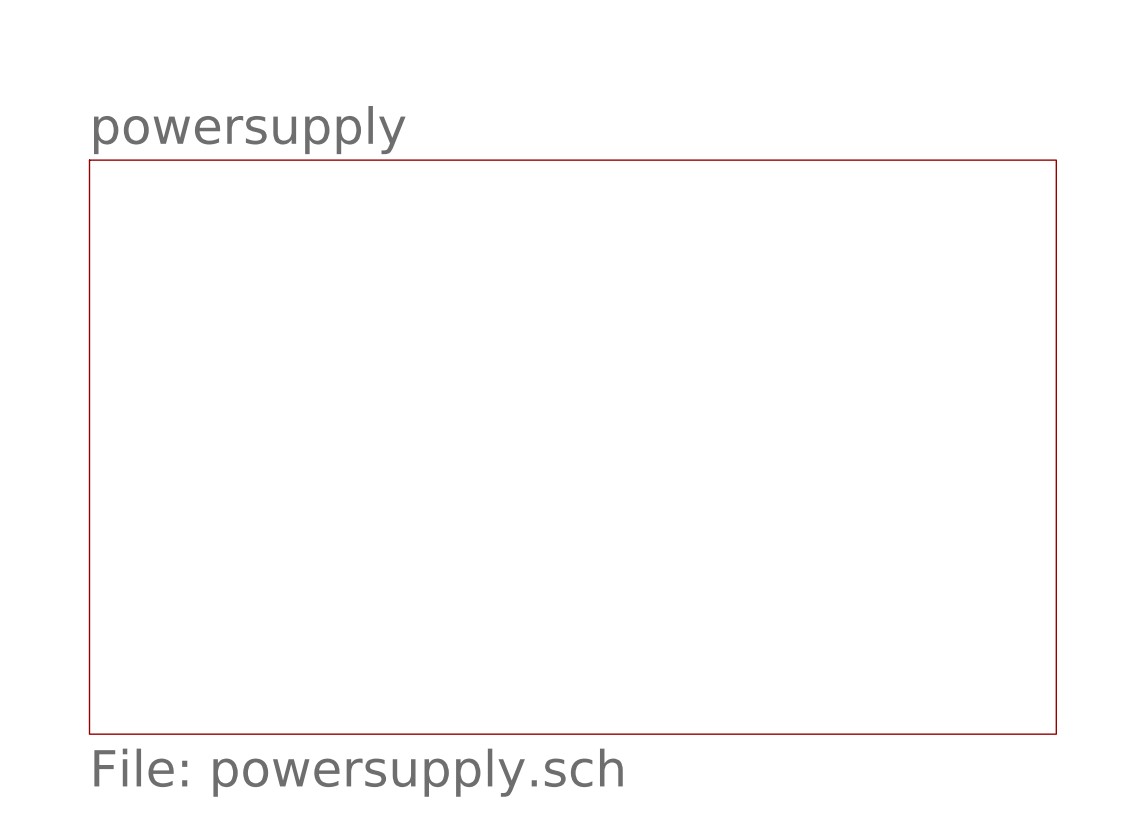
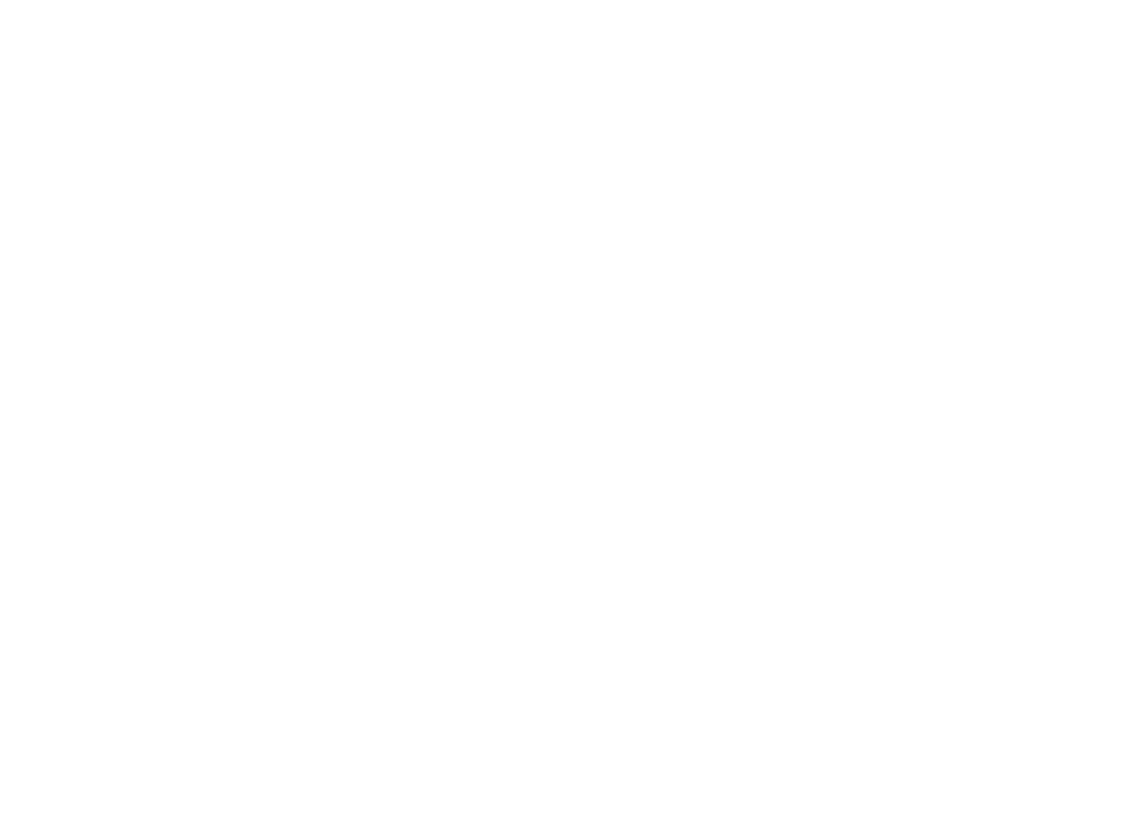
sheet powersupply: File: powersupply.sch (572, 447) -> none

